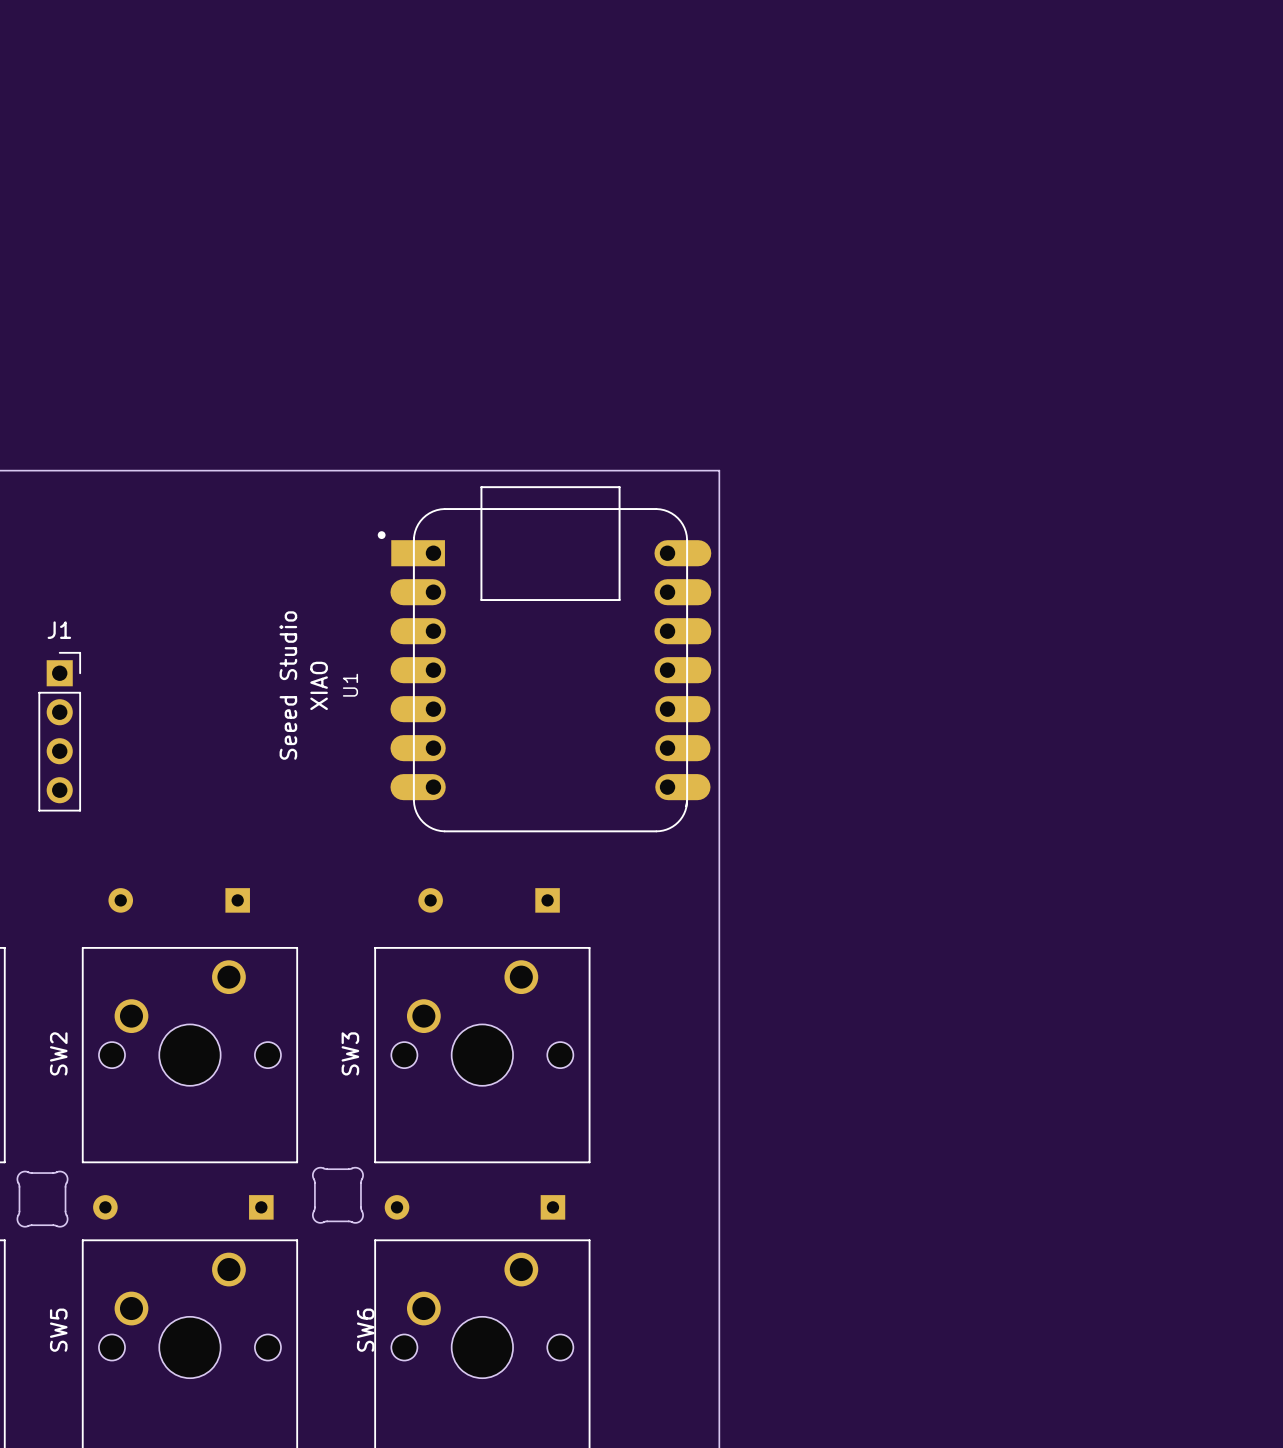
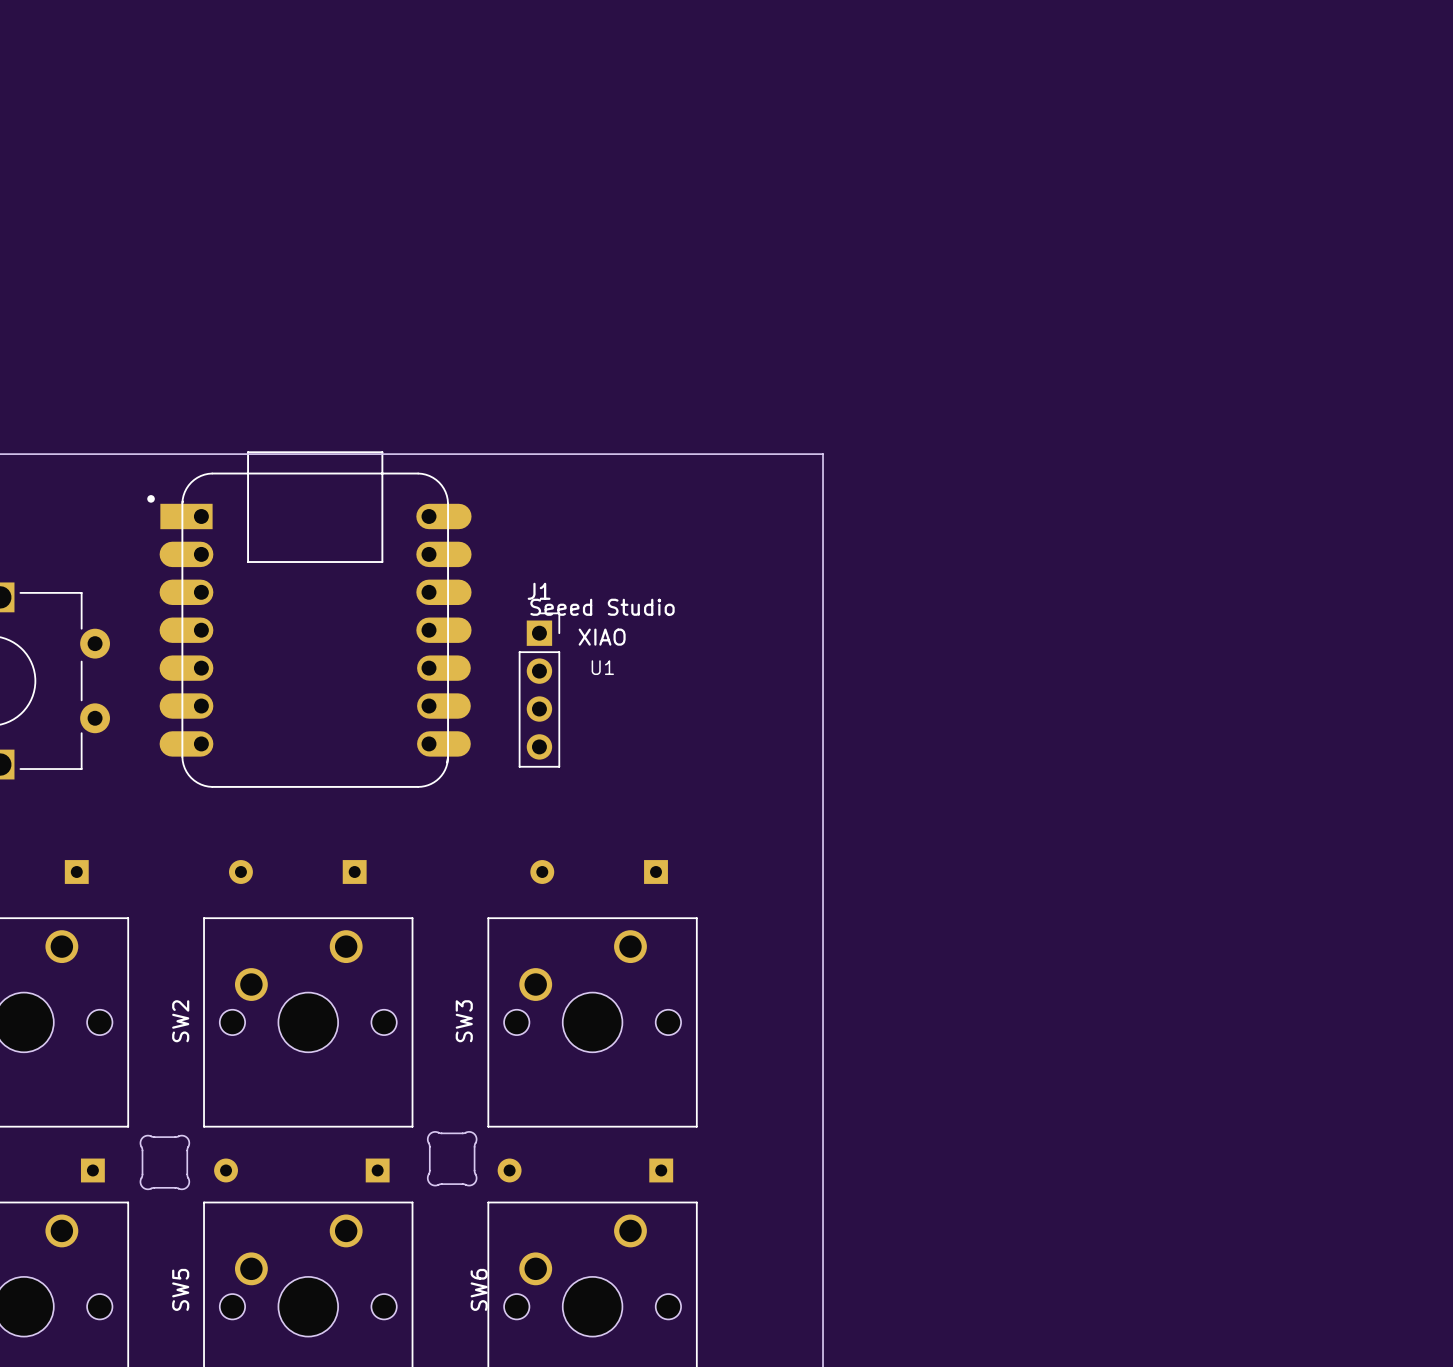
U1 position: (544, 659) -> (309, 619)
U1 text rotation: 0° (288, 685) -> 90° clockwise (602, 607)
U1 text position: Seeed Studio (288, 685) -> Seeed Studio (602, 607)
U1 text rotation: 0° (319, 685) -> 90° clockwise (602, 637)
U1 text position: XIAO (319, 685) -> XIAO (602, 637)
U1 name rotation: 0° (350, 685) -> 90° clockwise (602, 667)
U1 name position: U1 (350, 685) -> U1 (602, 667)
J1 position: (59, 731) -> (539, 690)

